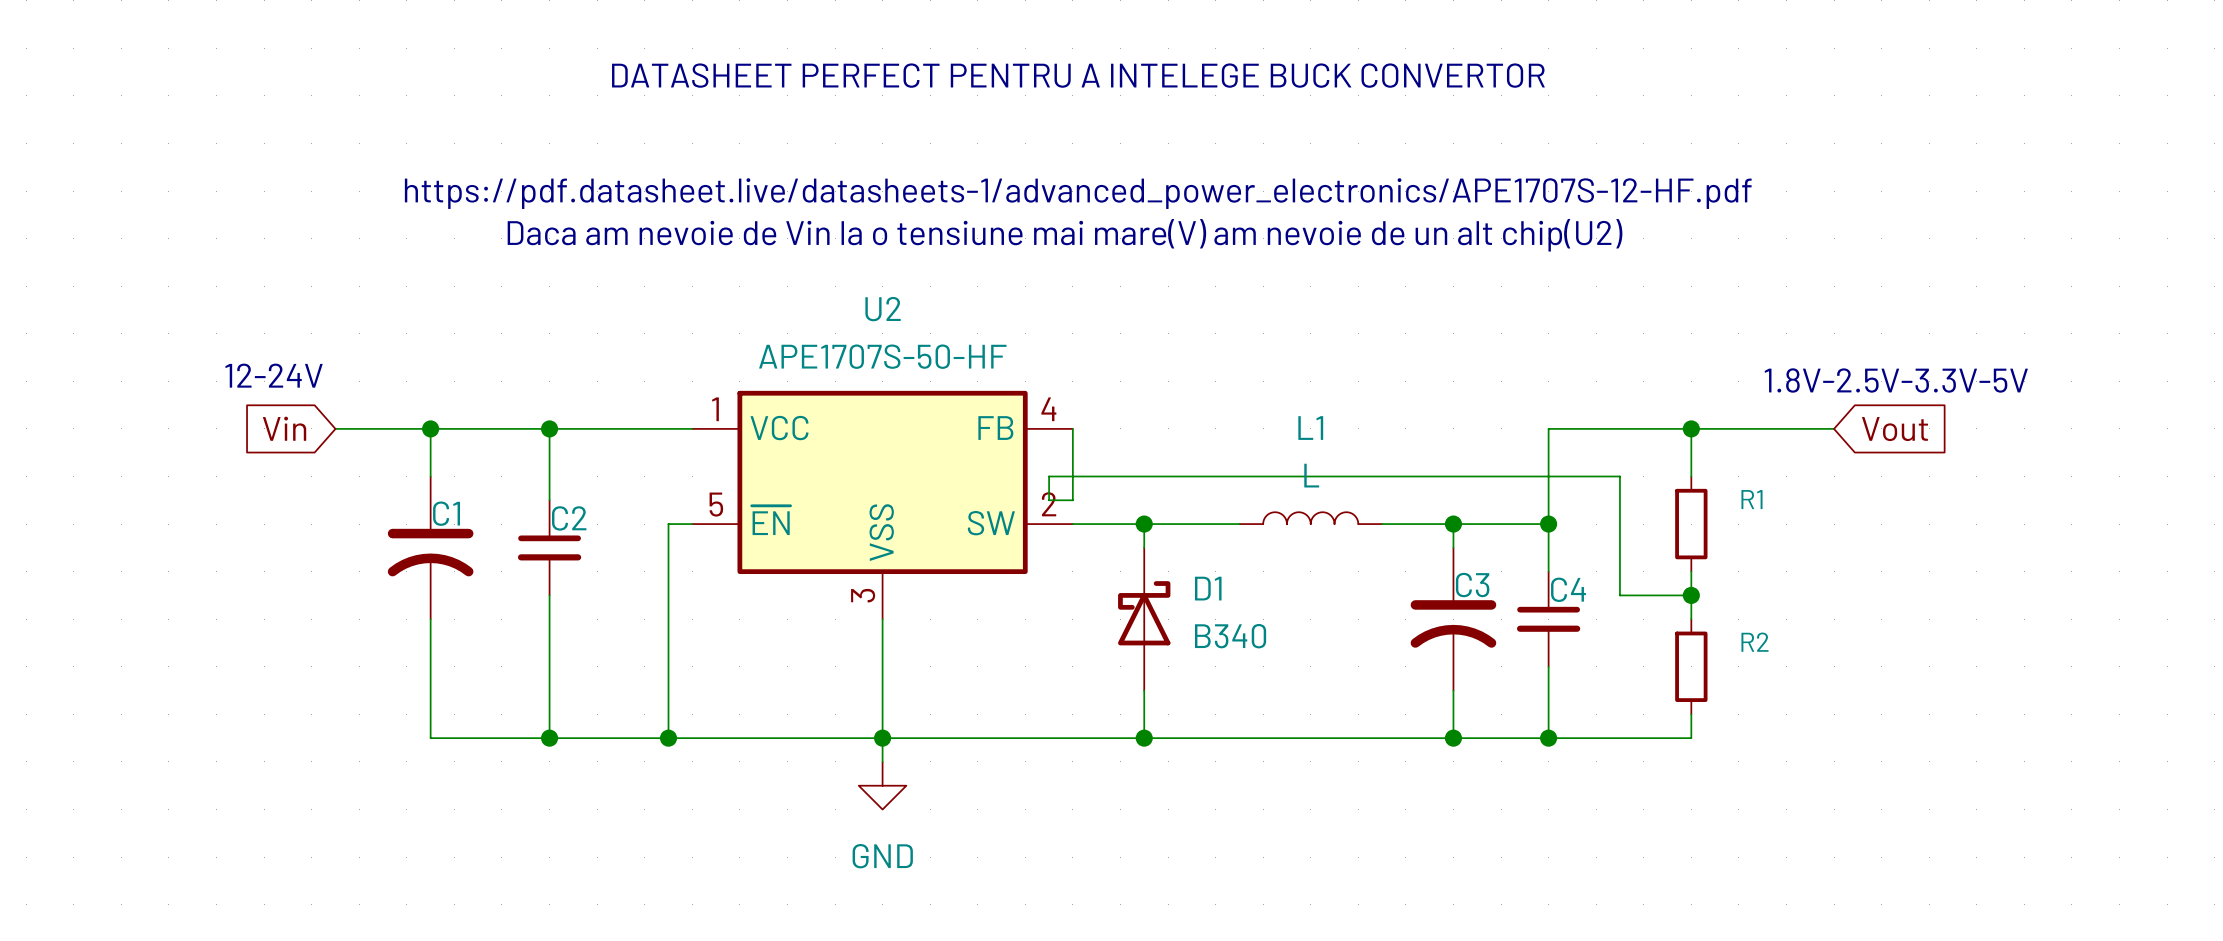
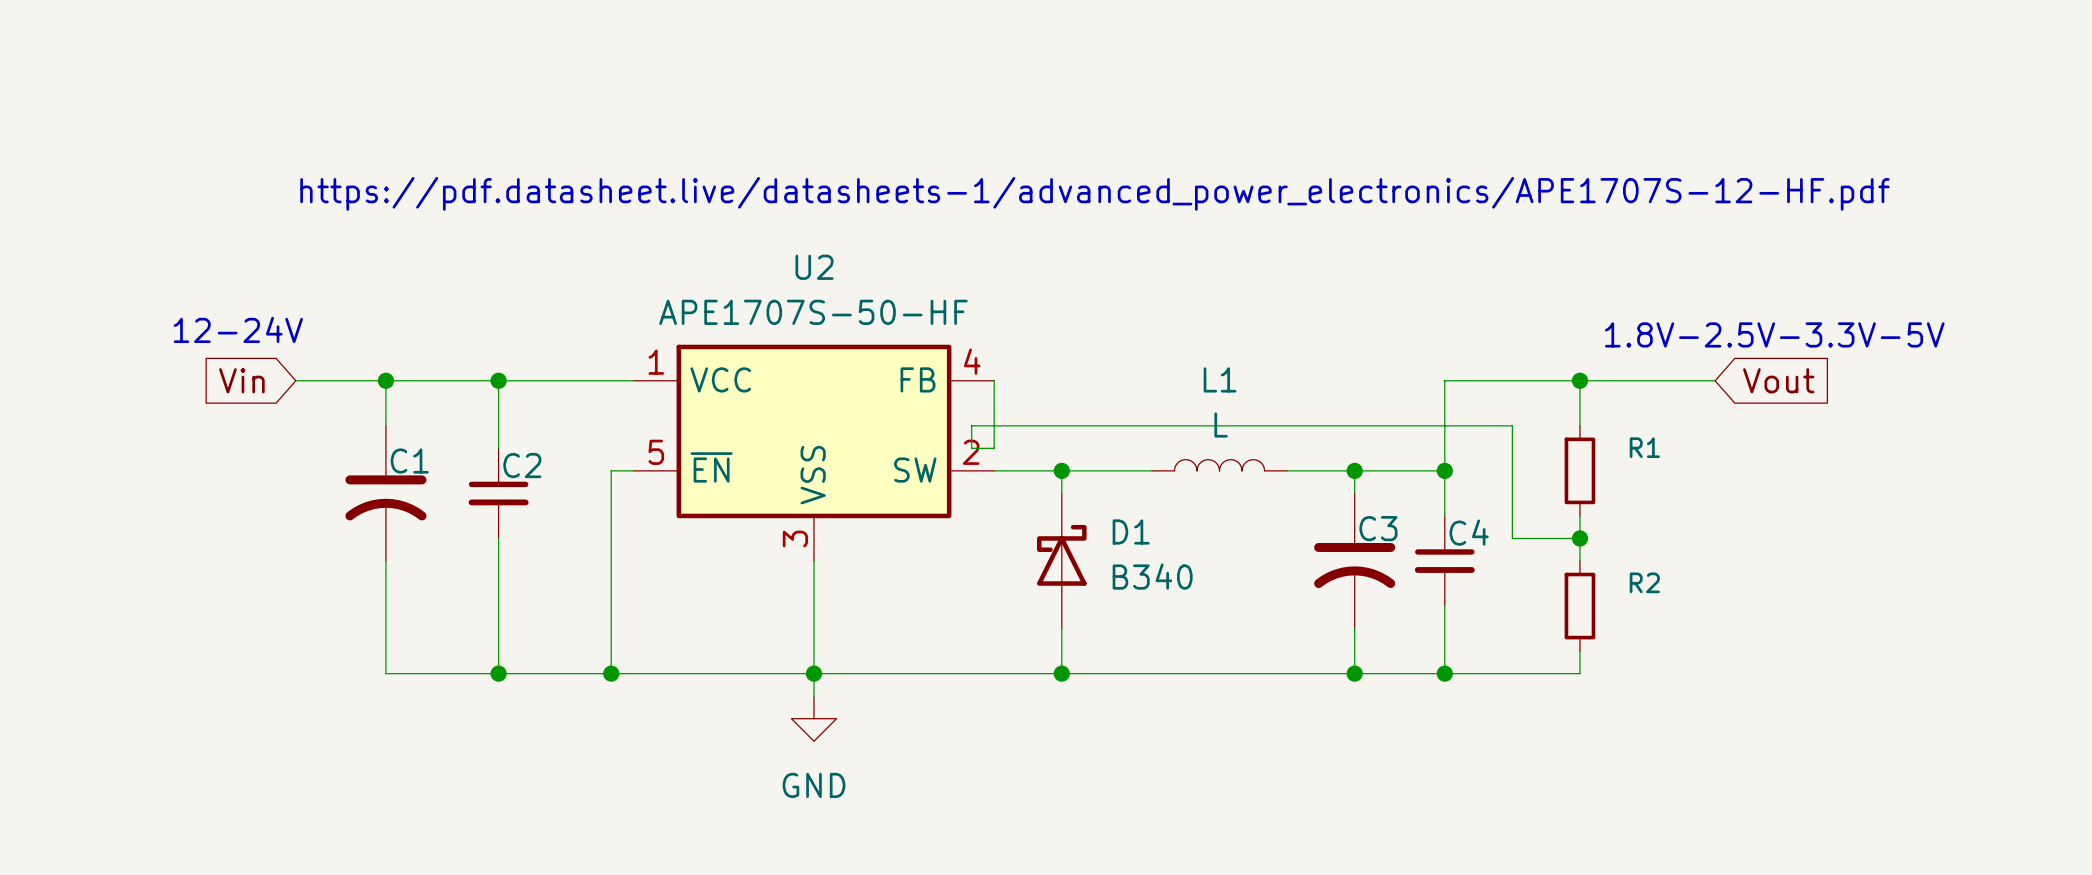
text: DATASHEET PERFECT PENTRU A INTELEGE BUCK CONVERTOR (1078, 75) -> none
text position: https://pdf.datasheet.live/datasheets-1/advanced_power_electronics/APE1707S-12-HF.pdf (1078, 193) -> https://pdf.datasheet.live/datasheets-1/advanced_power_electronics/APE1707S-12-HF.pdf (1094, 193)
text: Daca am nevoie de Vin la o tensiune mai mare(V) am nevoie de un alt chip(U2) (1065, 235) -> none

